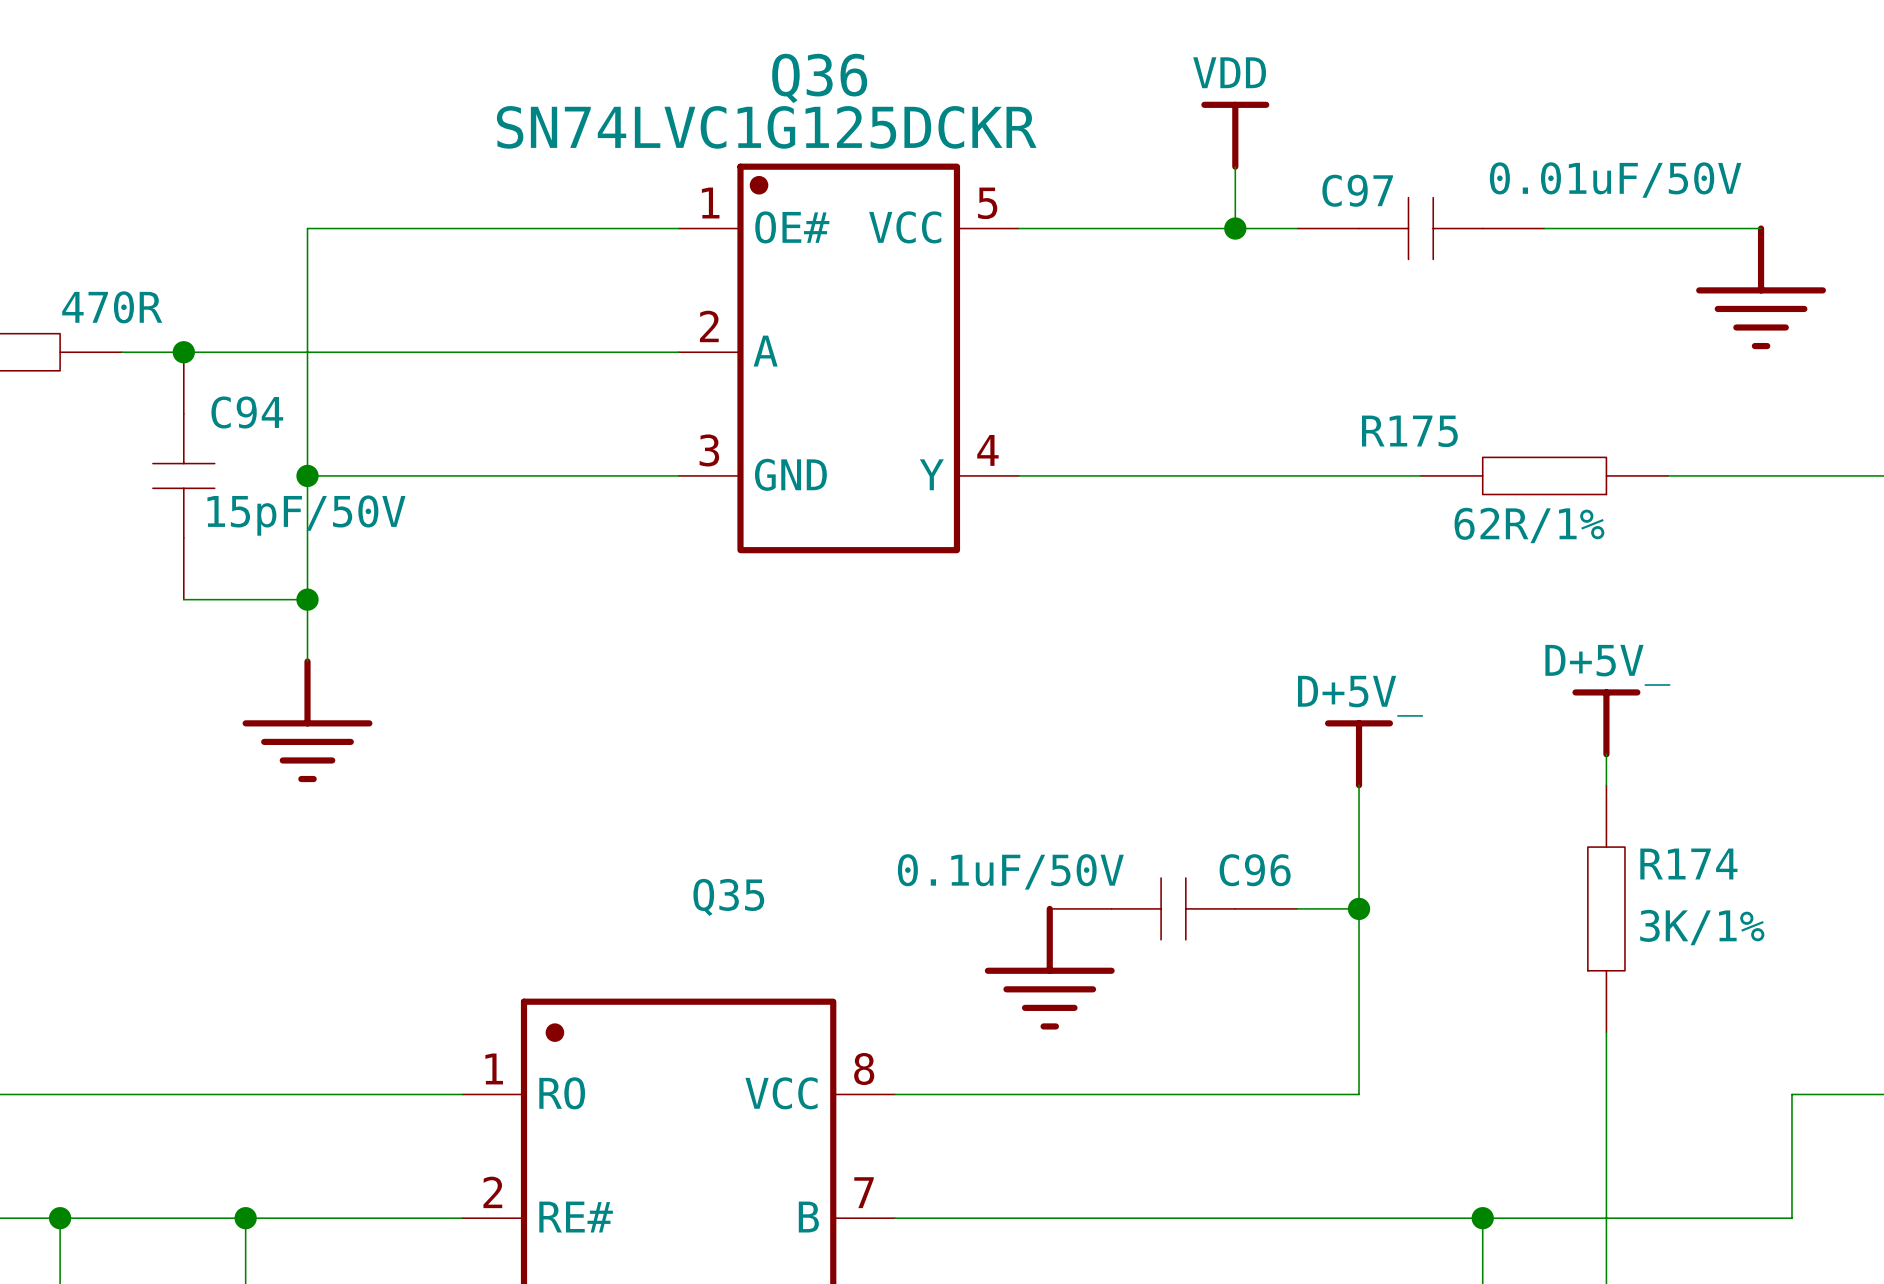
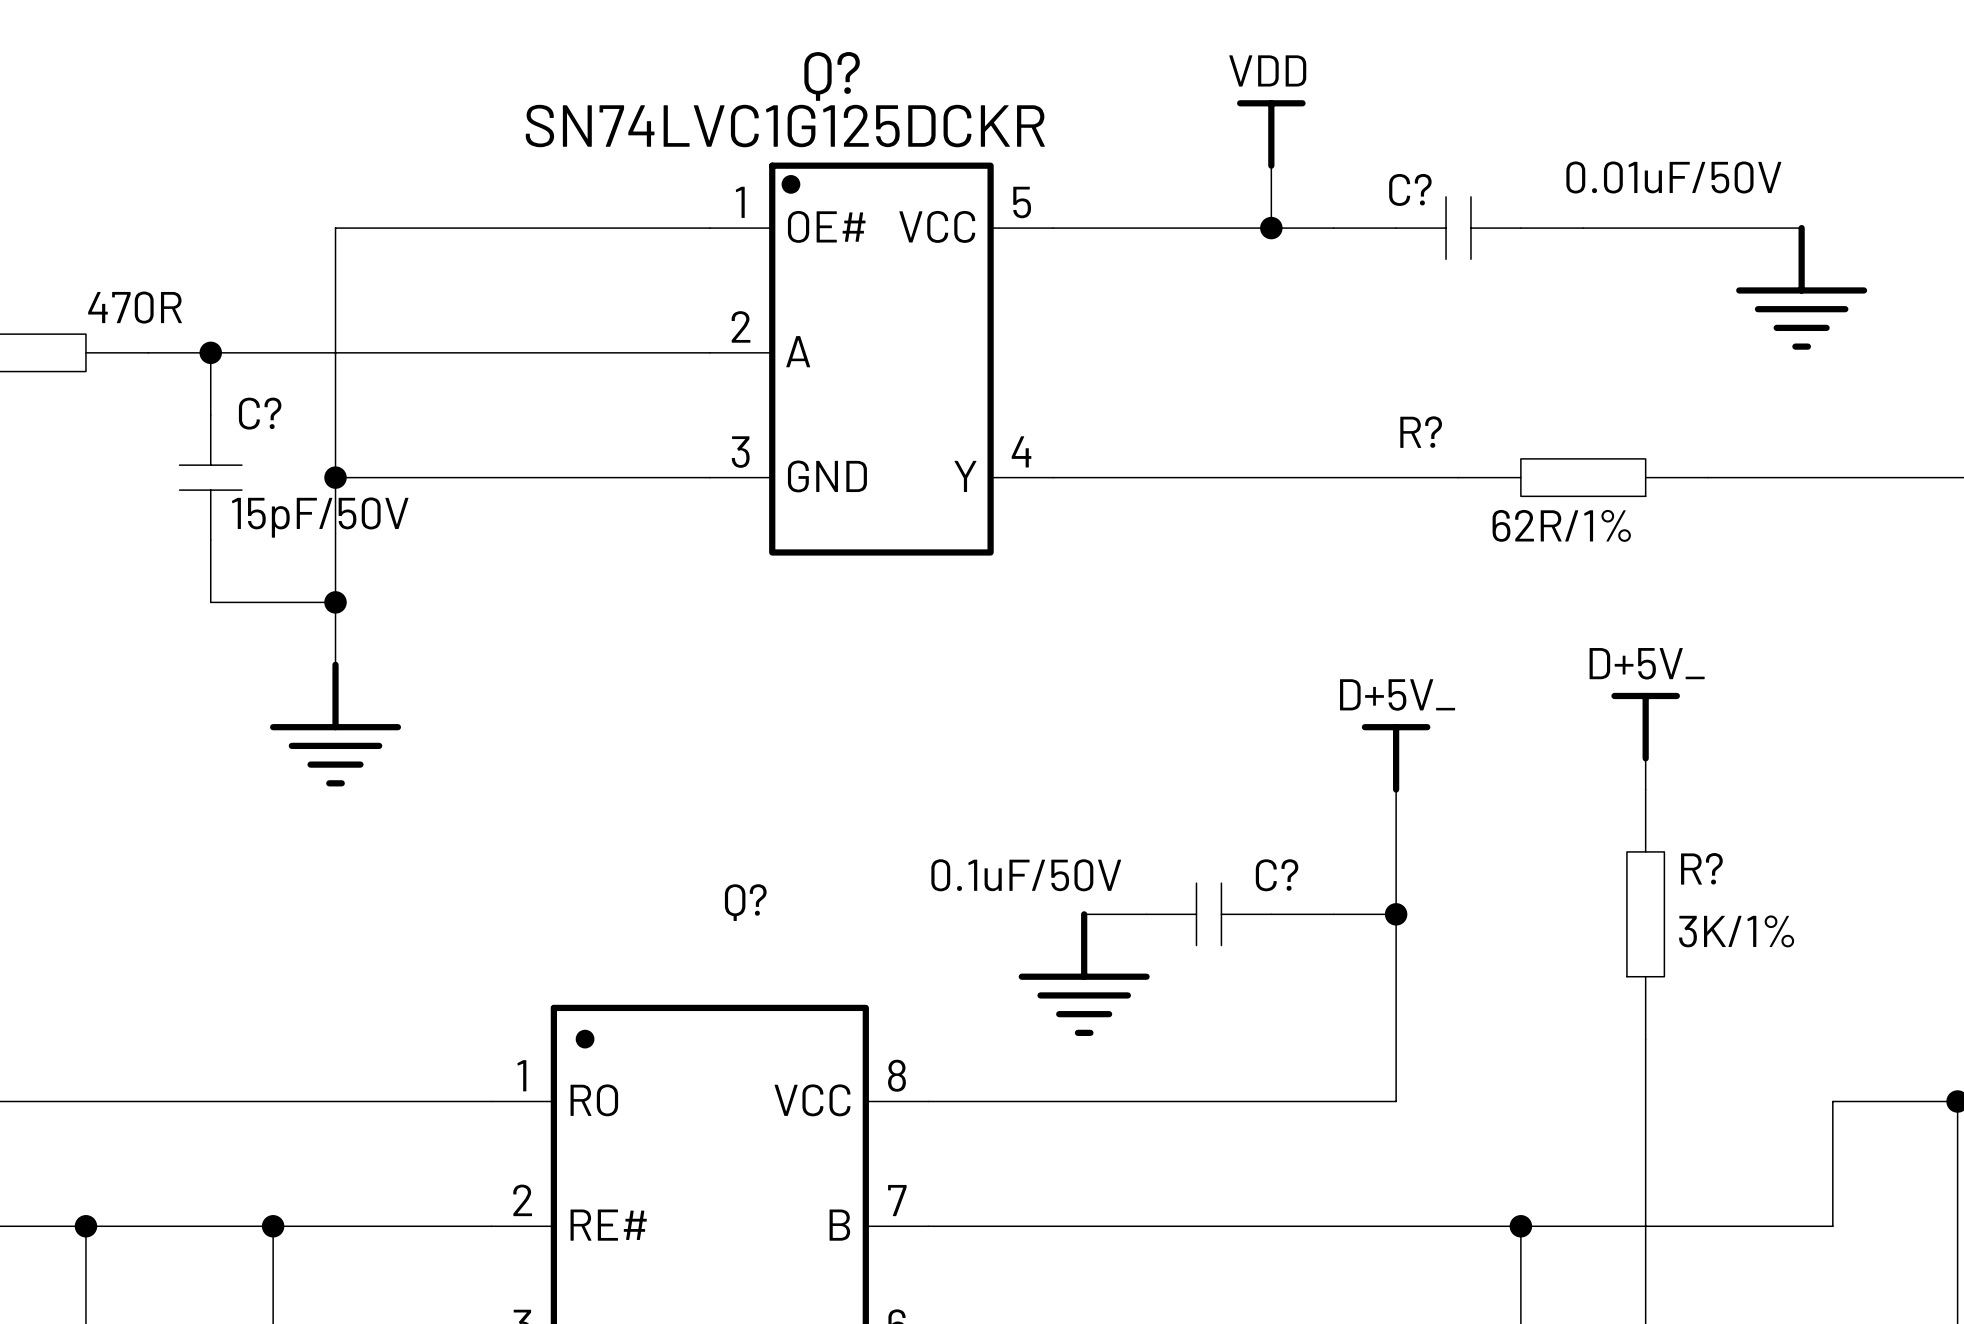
Q36 name: Q36 (819, 78) -> Q? (832, 76)
C97 name: C97 (1357, 190) -> C? (1410, 189)
C94 name: C94 (247, 412) -> C? (260, 413)
R175 name: R175 (1409, 431) -> R? (1421, 432)
R174 name: R174 (1688, 864) -> R? (1701, 868)
C96 name: C96 (1255, 870) -> C? (1277, 875)
Q35 name: Q35 (728, 897) -> Q? (745, 902)

